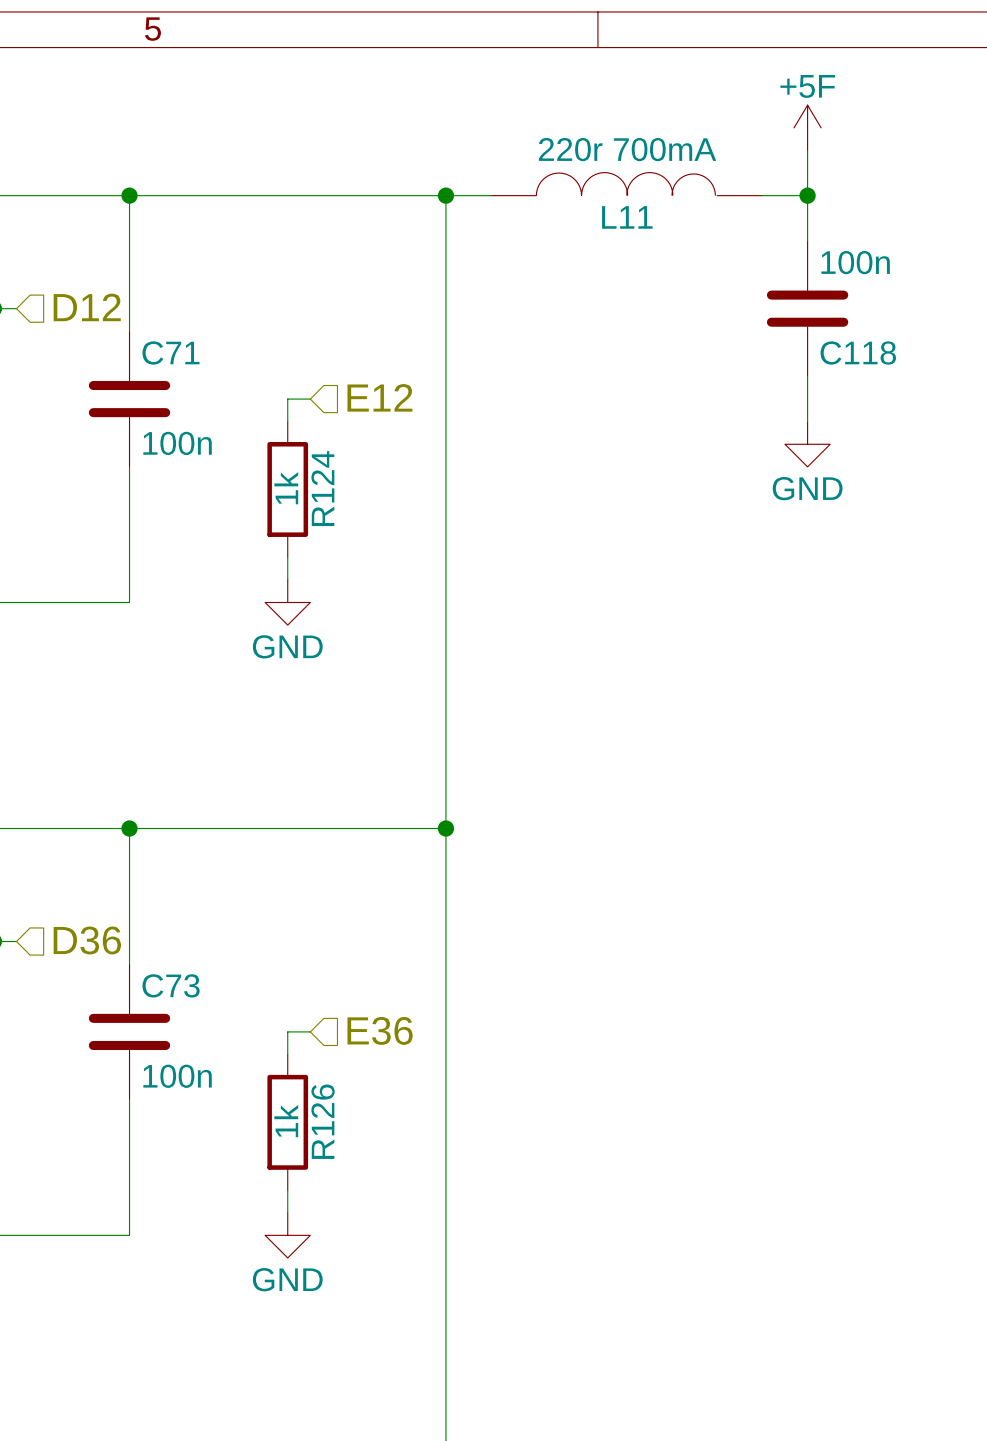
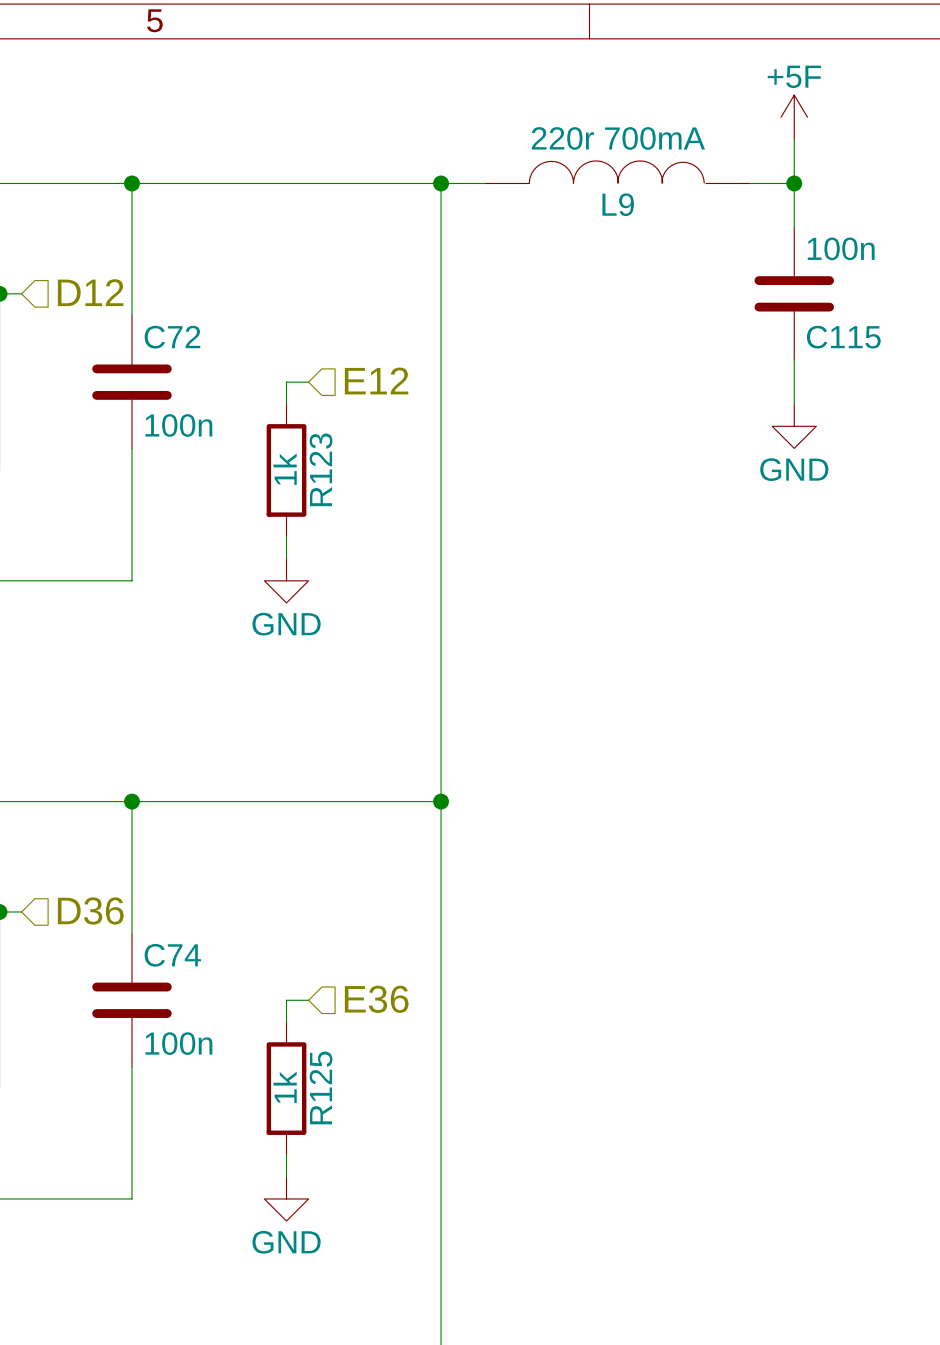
L11 name: L11 (627, 217) -> L9 (618, 204)
C71 name: C71 (170, 353) -> C72 (172, 337)
C118 name: C118 (858, 353) -> C115 (843, 337)
R124 name: R124 (322, 488) -> R123 (321, 469)
C73 name: C73 (171, 985) -> C74 (172, 955)
R126 name: R126 (323, 1121) -> R125 (321, 1087)

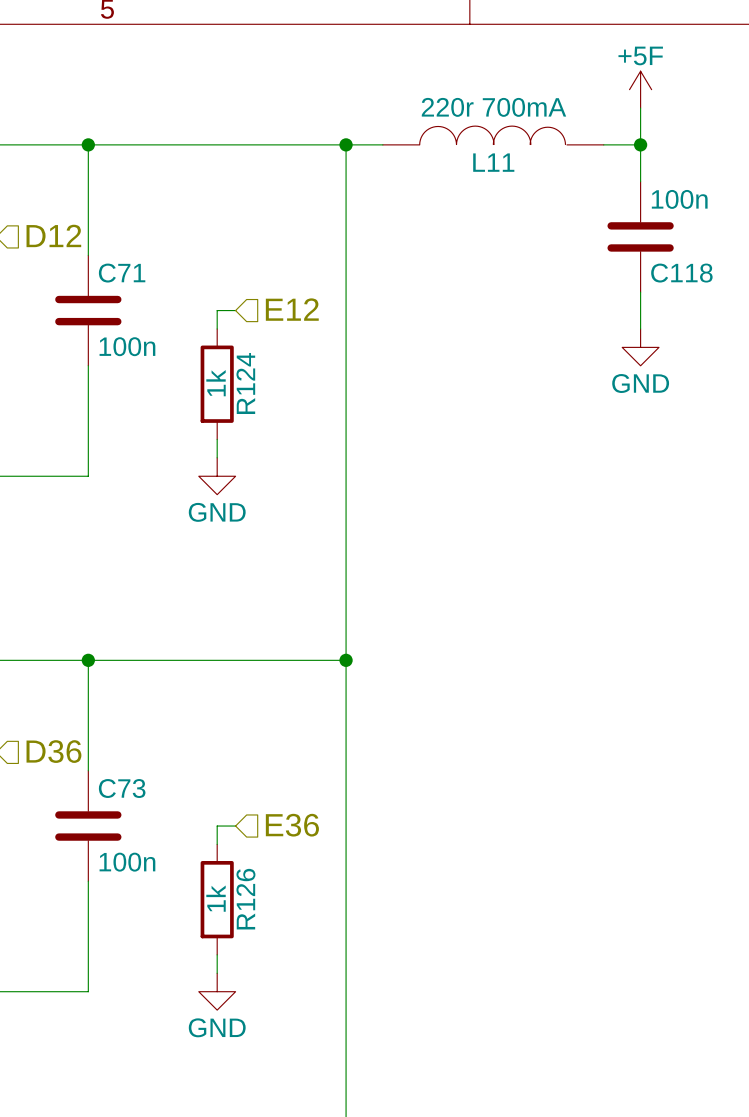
L9 name: L9 (618, 204) -> L11 (493, 162)
C72 name: C72 (172, 337) -> C71 (122, 273)
C115 name: C115 (843, 337) -> C118 (681, 273)
R123 name: R123 (321, 469) -> R124 (245, 383)
C74 name: C74 (172, 955) -> C73 (122, 788)
R125 name: R125 (321, 1087) -> R126 (245, 899)

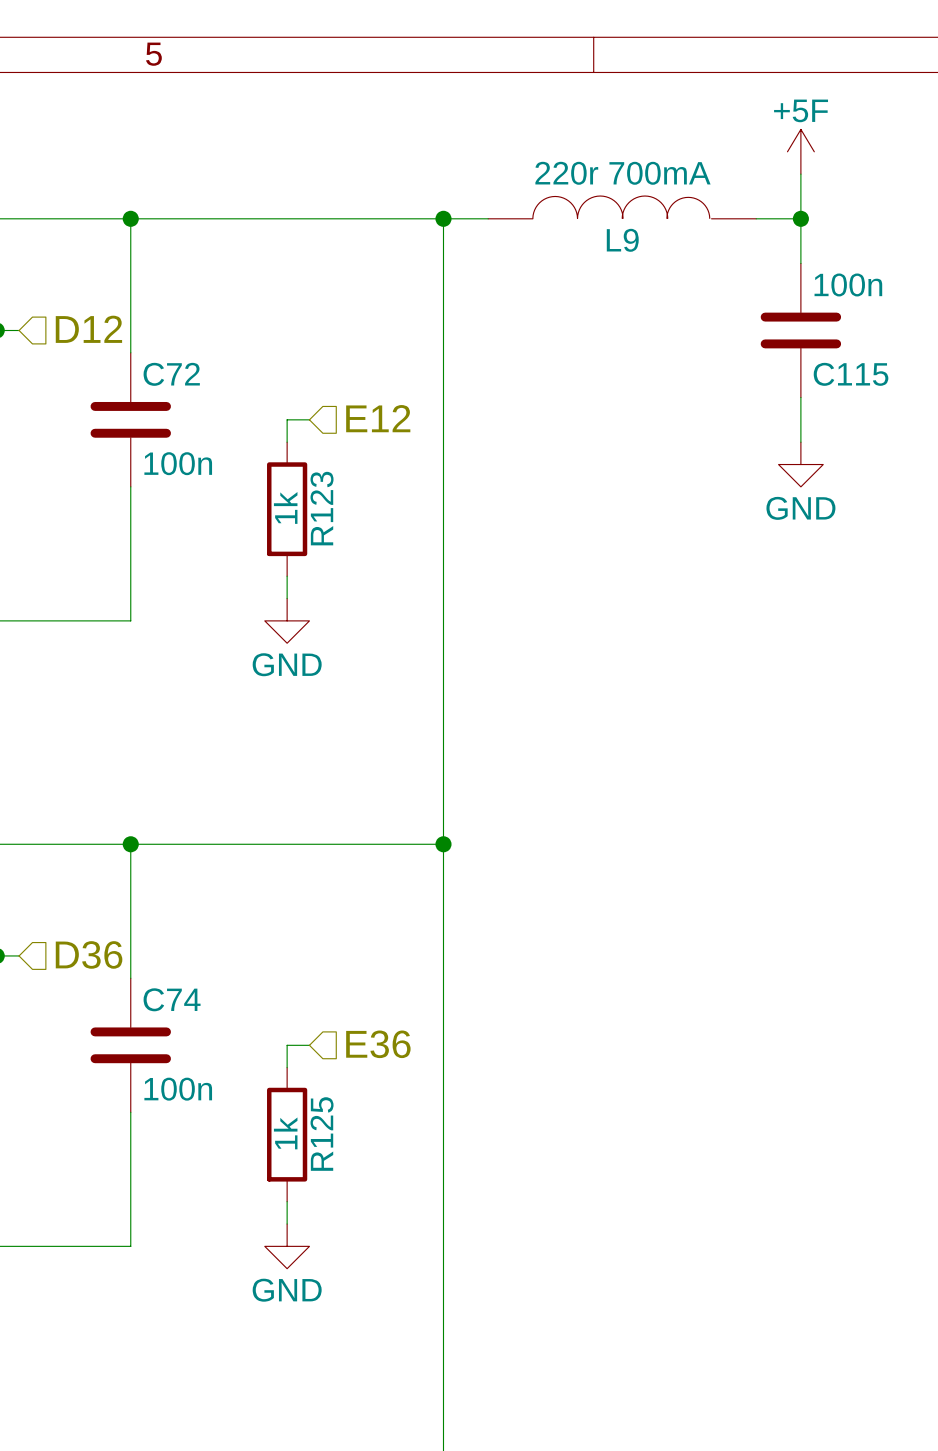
L11 name: L11 (493, 162) -> L9 (622, 240)
C71 name: C71 (122, 273) -> C72 (171, 374)
C118 name: C118 (681, 273) -> C115 (851, 374)
R124 name: R124 (245, 383) -> R123 (322, 508)
C73 name: C73 (122, 788) -> C74 (172, 999)
R126 name: R126 (245, 899) -> R125 (322, 1134)

